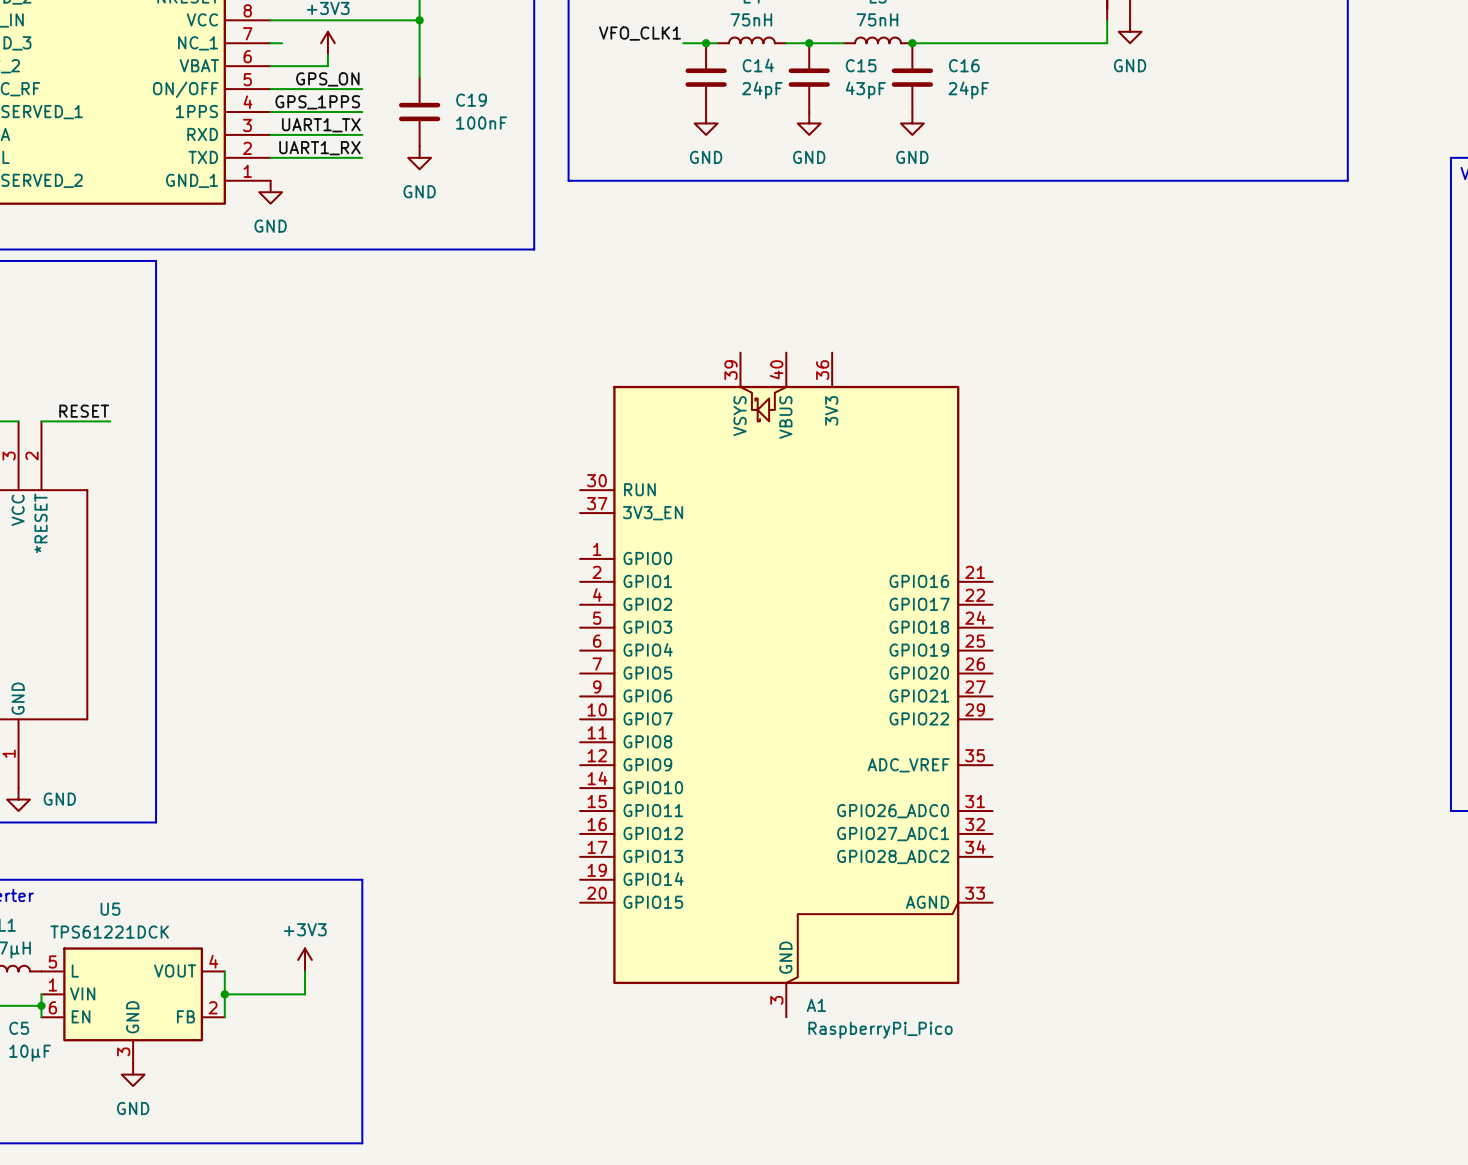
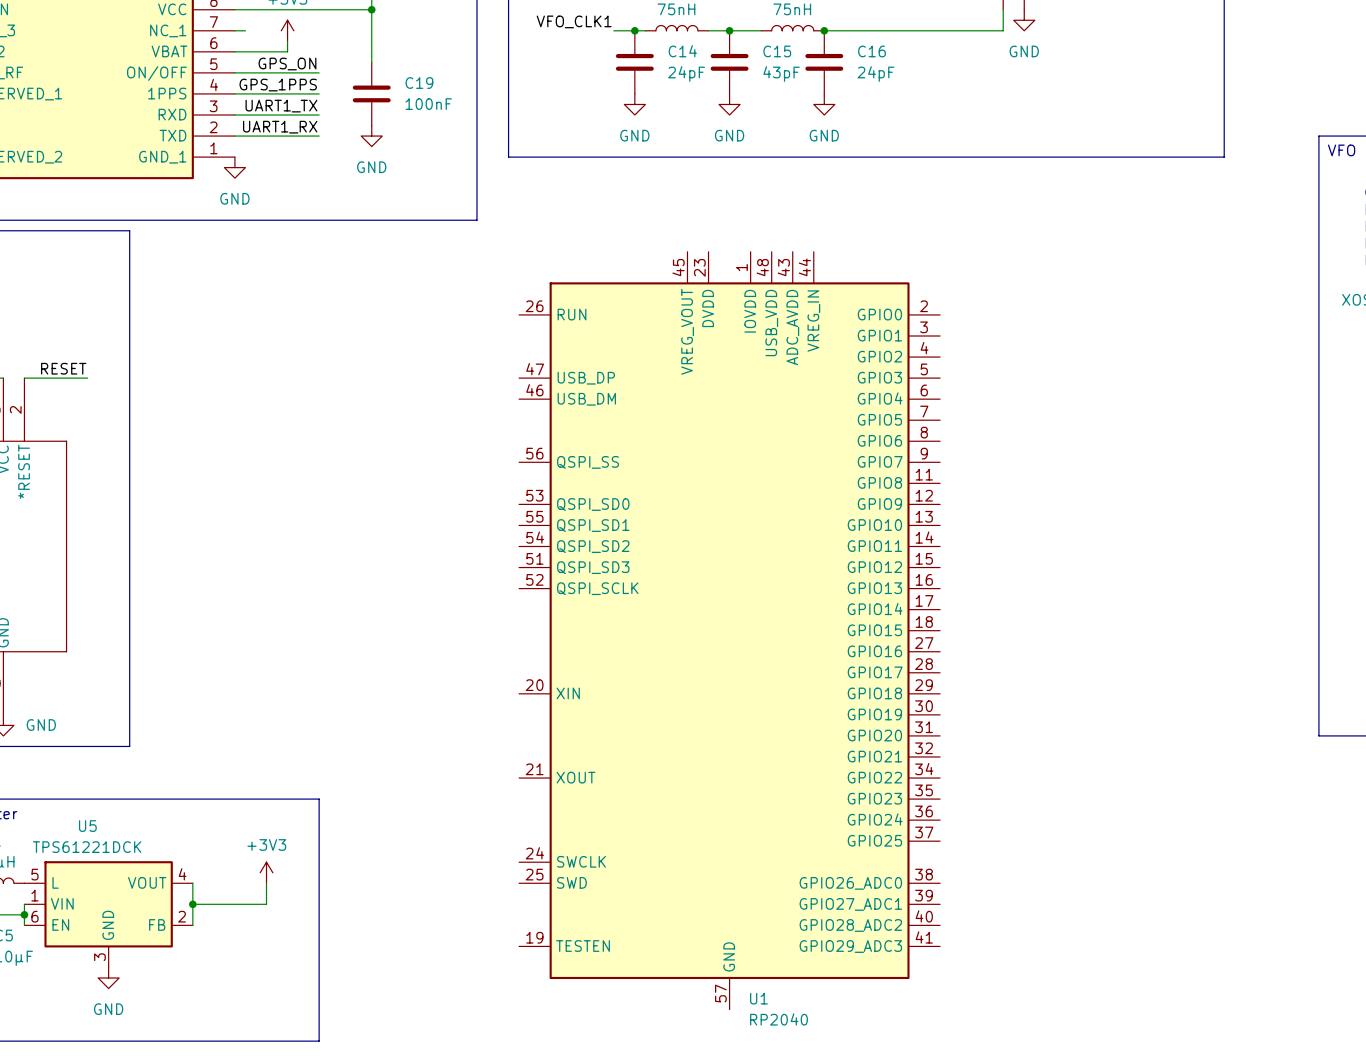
A1: RaspberryPi_Pico (786, 684) -> none
U1: none -> RP2040 (729, 630)

